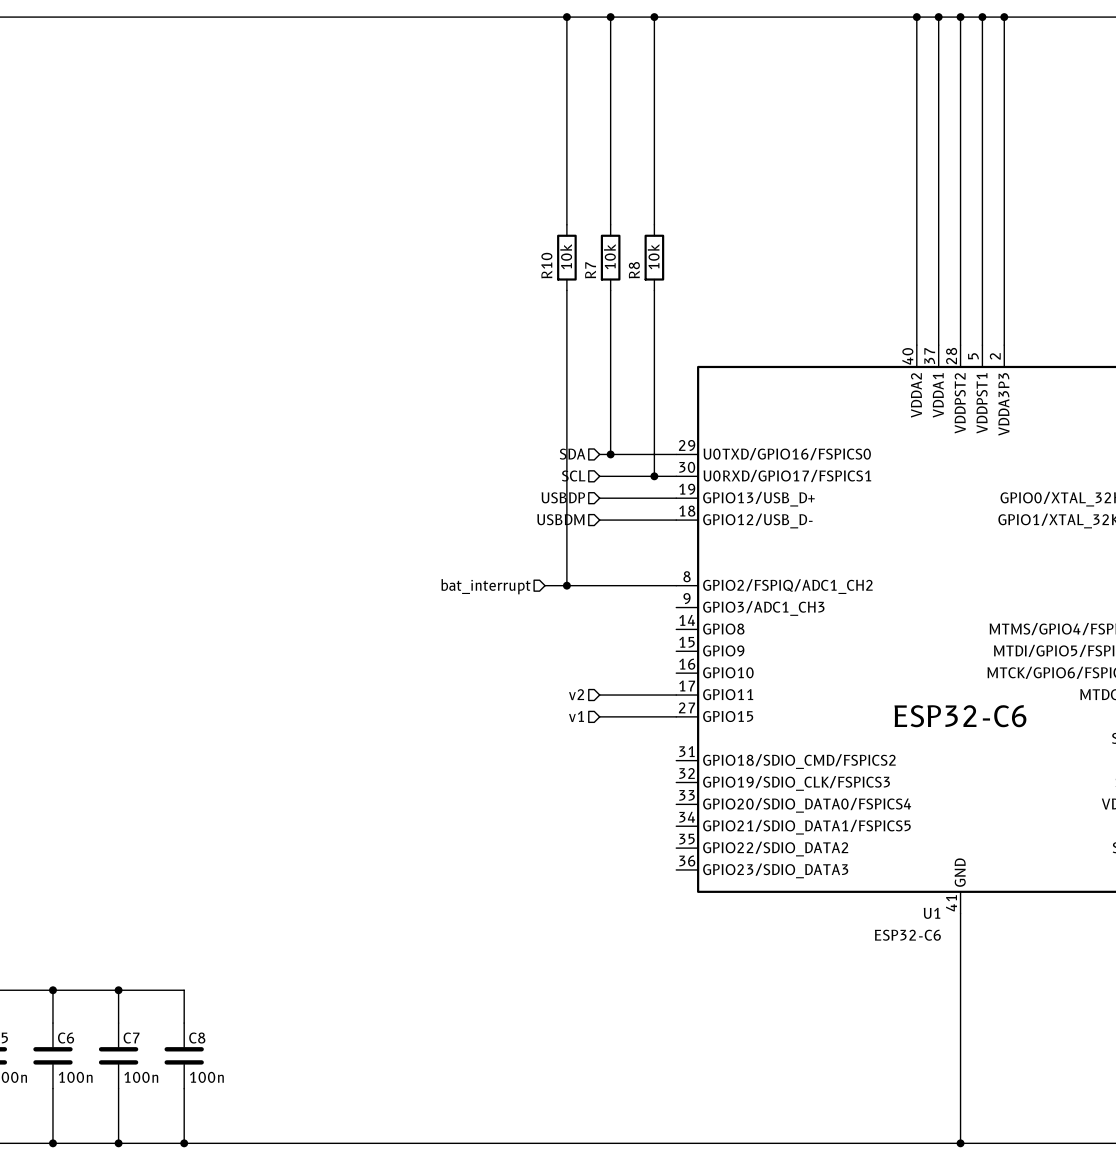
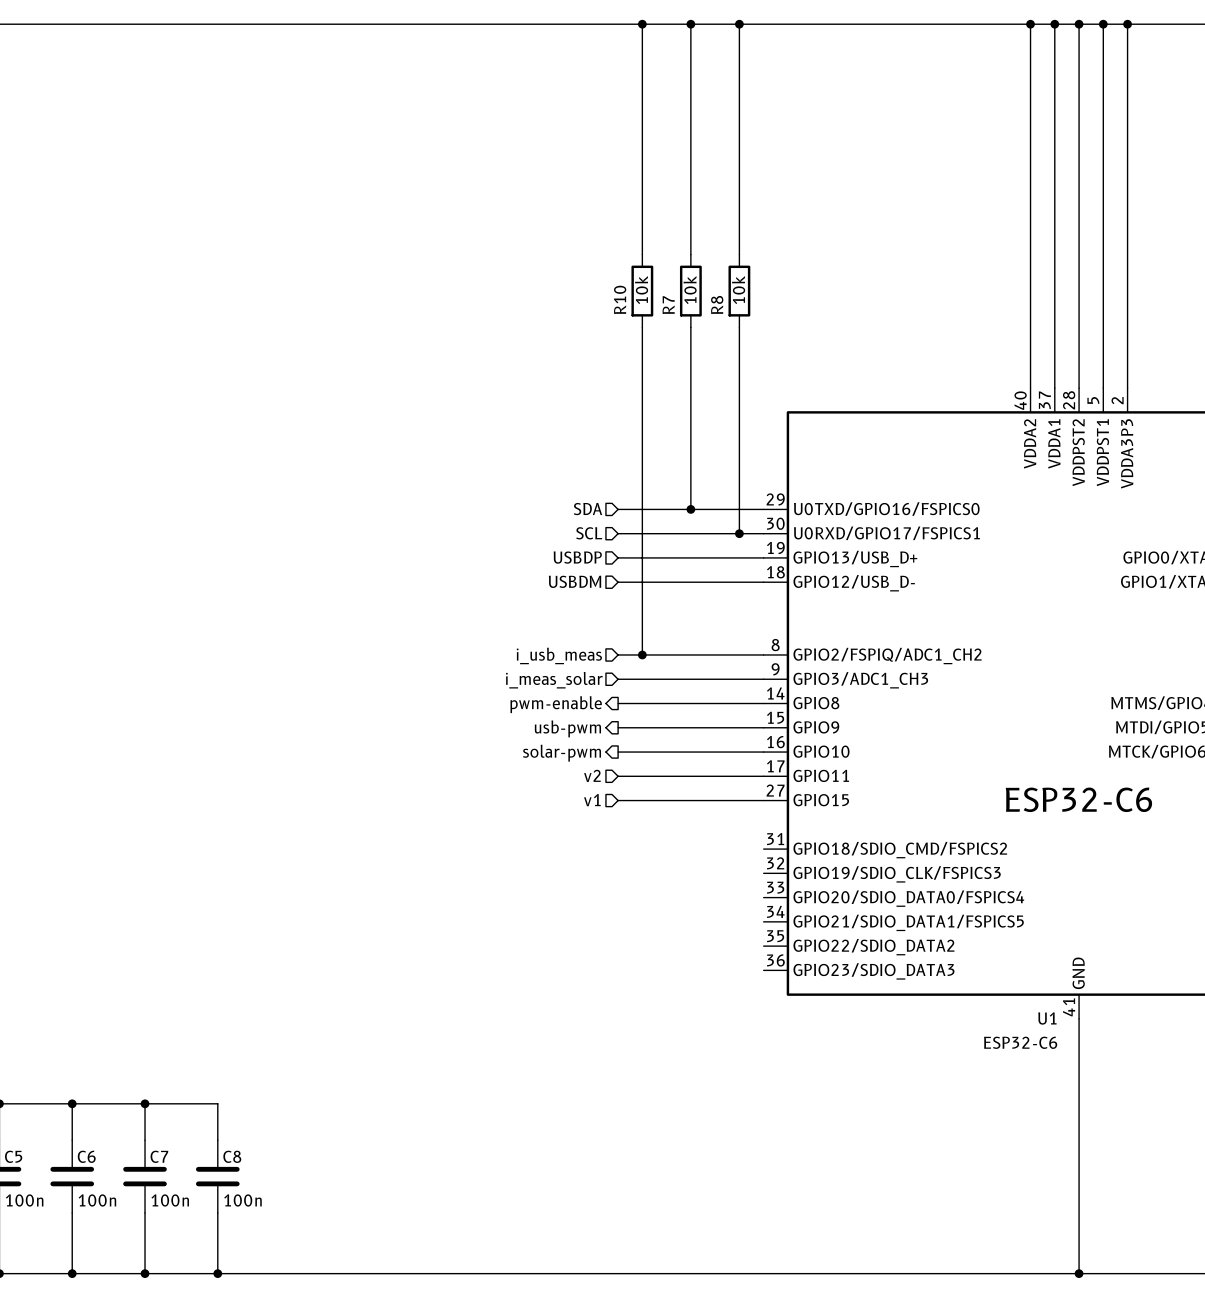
wire: none -> (618, 509) (678, 509)
hierarchical label position: SDA (572, 454) -> SDA (587, 509)
hierarchical label position: SCL (573, 475) -> SCL (589, 533)
wire: none -> (618, 533) (678, 533)
hierarchical label position: USBDP (563, 497) -> USBDP (577, 557)
wire: none -> (618, 557) (678, 557)
hierarchical label position: USBDM (560, 519) -> USBDM (575, 581)
wire: none -> (618, 582) (678, 582)
hierarchical label: bat_interrupt (486, 586) -> i_usb_meas (559, 655)
wire: none -> (618, 679) (763, 679)
hierarchical label: none -> i_meas_solar (554, 680)
wire: none -> (618, 703) (763, 703)
hierarchical label: none -> pwm-enable (556, 704)
wire: none -> (618, 727) (763, 727)
hierarchical label: none -> usb-pwm (567, 728)
wire: none -> (618, 752) (763, 752)
hierarchical label: none -> solar-pwm (562, 753)
hierarchical label position: v2 (576, 694) -> v2 (592, 775)
wire: none -> (618, 776) (678, 776)
wire: none -> (618, 800) (678, 800)
hierarchical label position: v1 (576, 716) -> v1 (592, 800)

